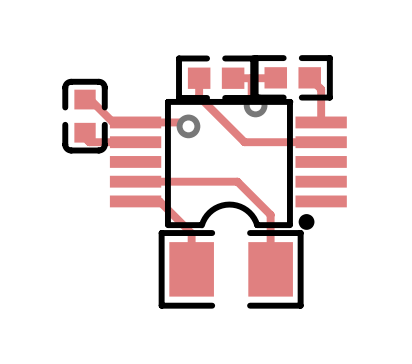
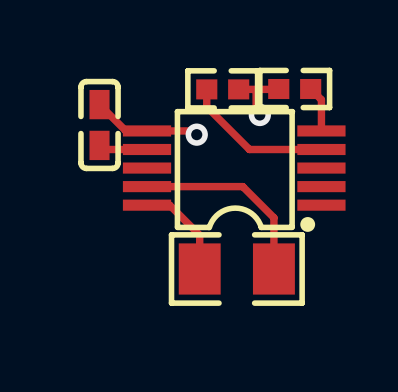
part footprint: [62, 78, 108, 154] -> [78, 78, 121, 172]

